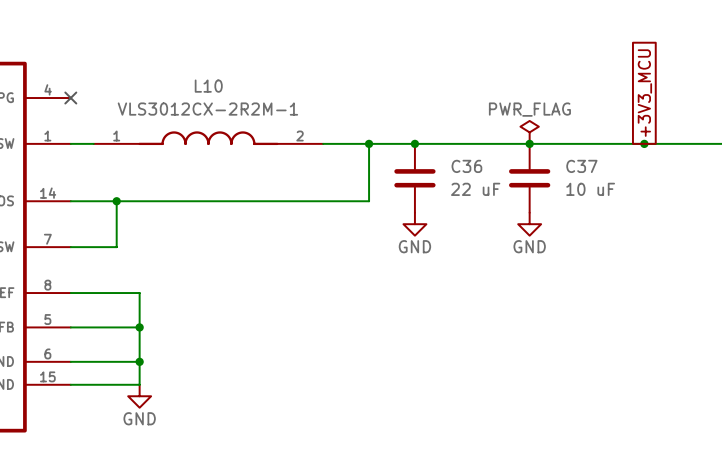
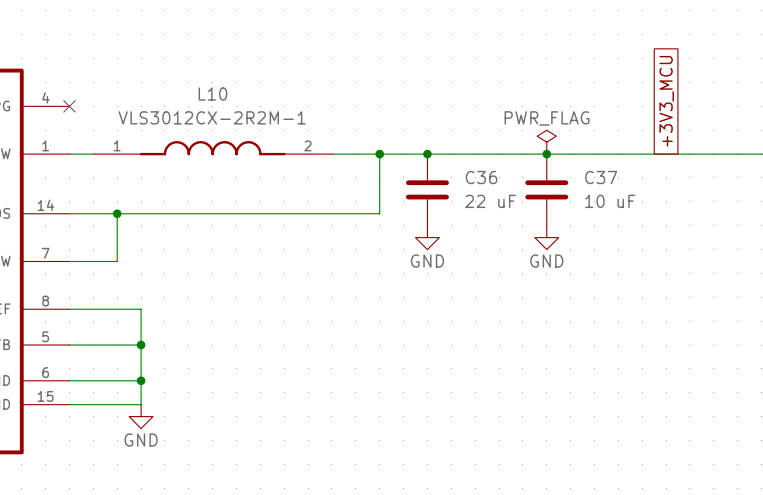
junction: (644, 143) -> none

